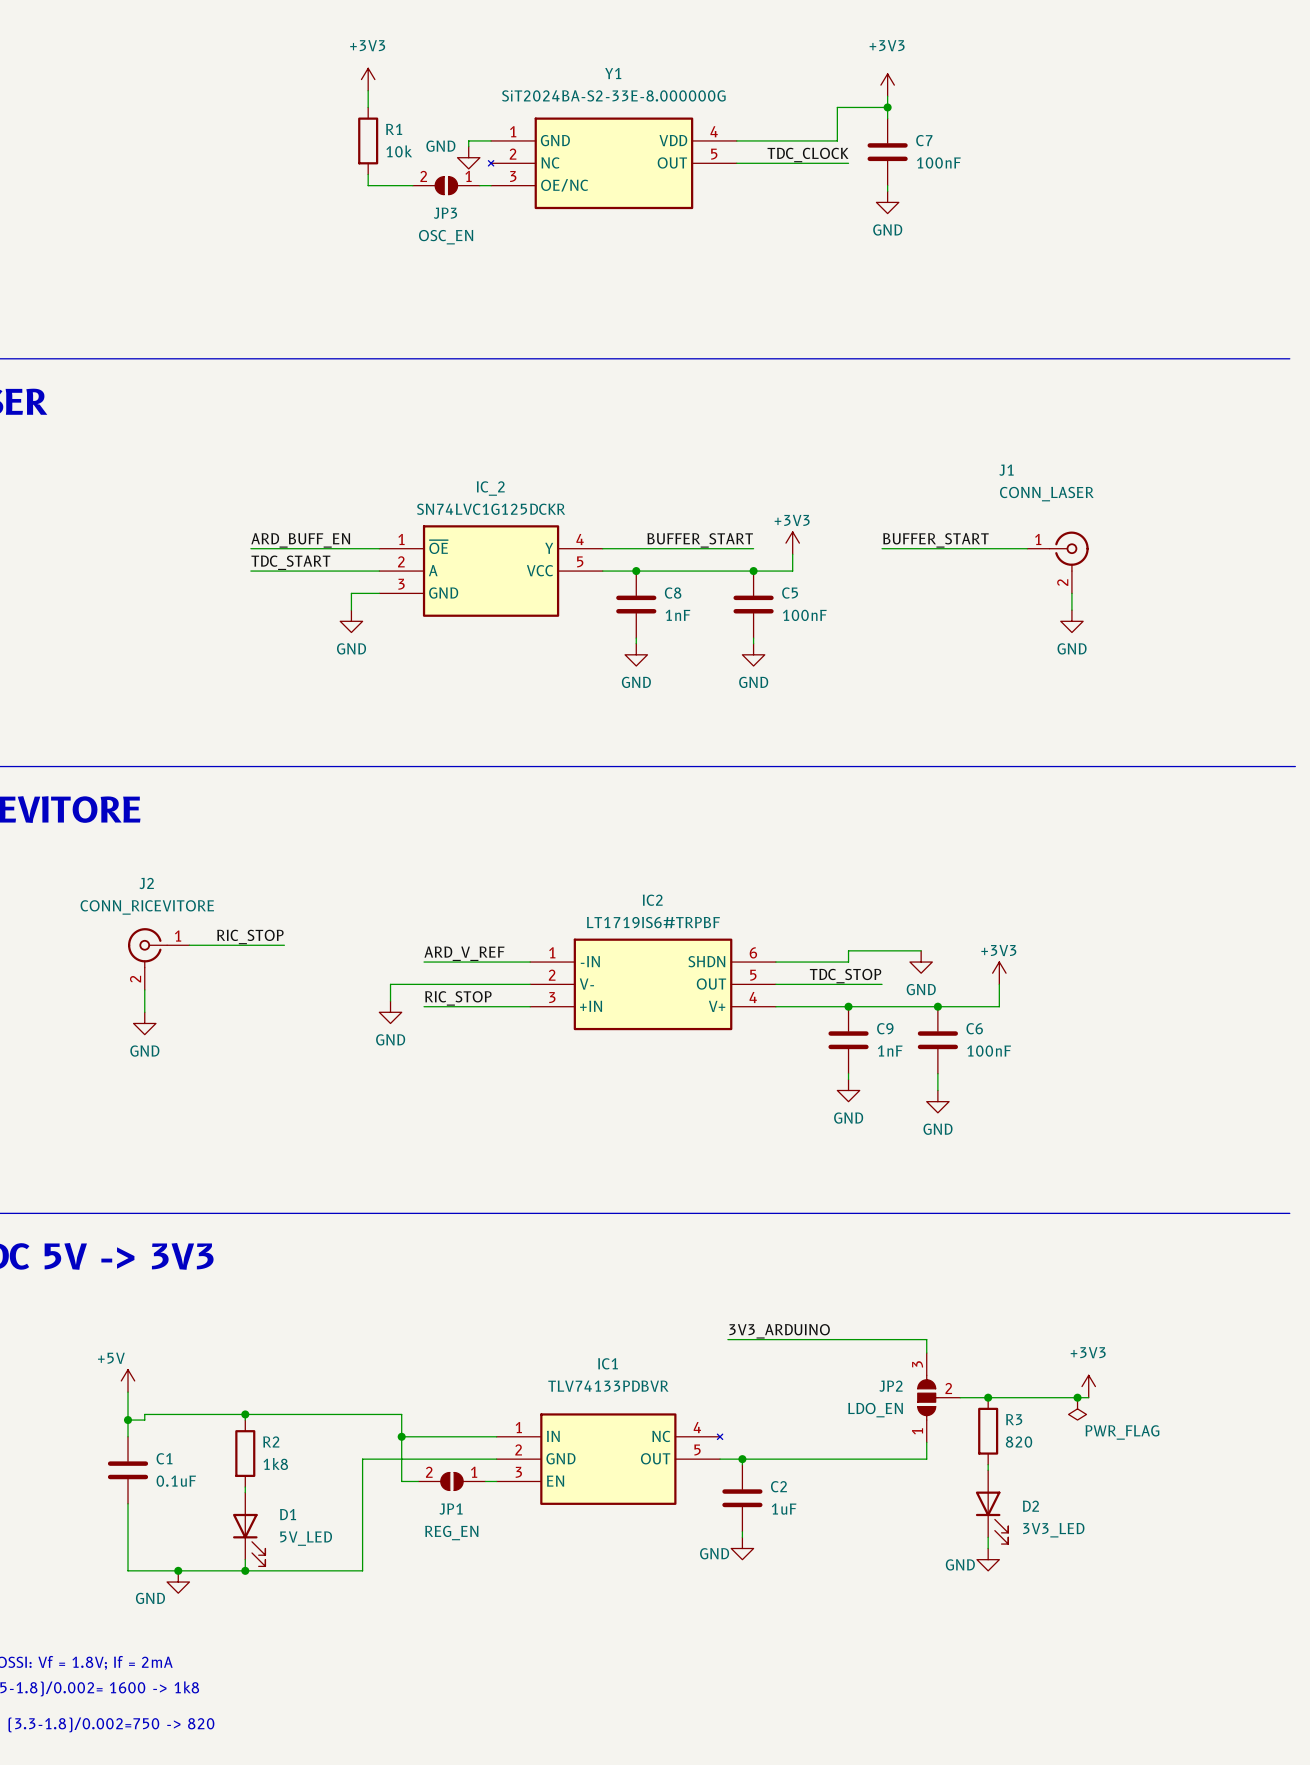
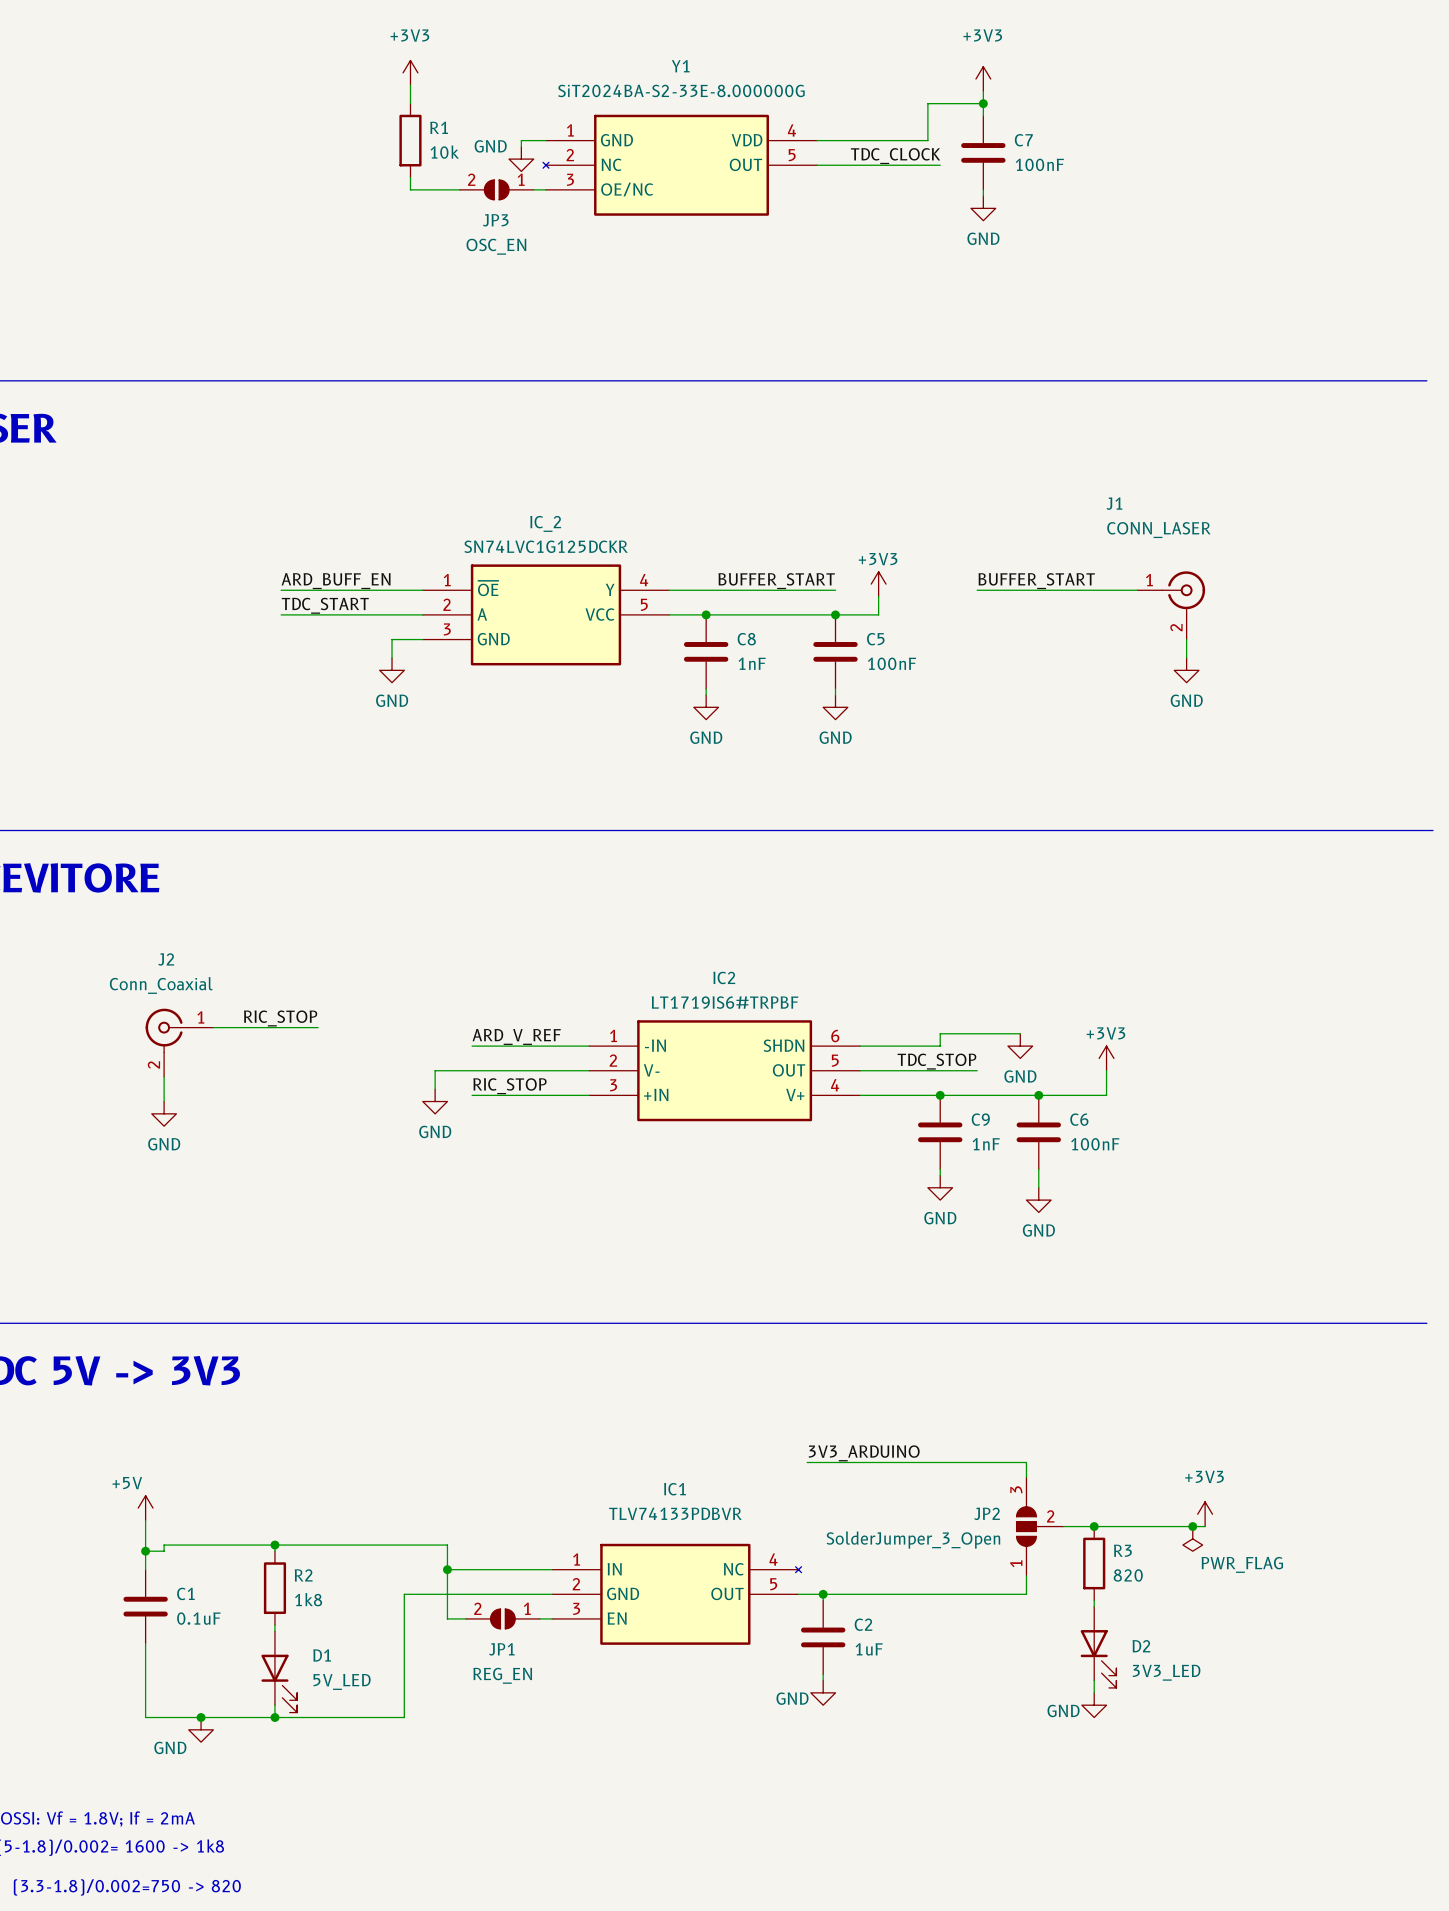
J2 value: CONN_RICEVITORE (147, 907) -> Conn_Coaxial (161, 985)
JP2 value: LDO_EN (875, 1410) -> SolderJumper_3_Open (913, 1540)

